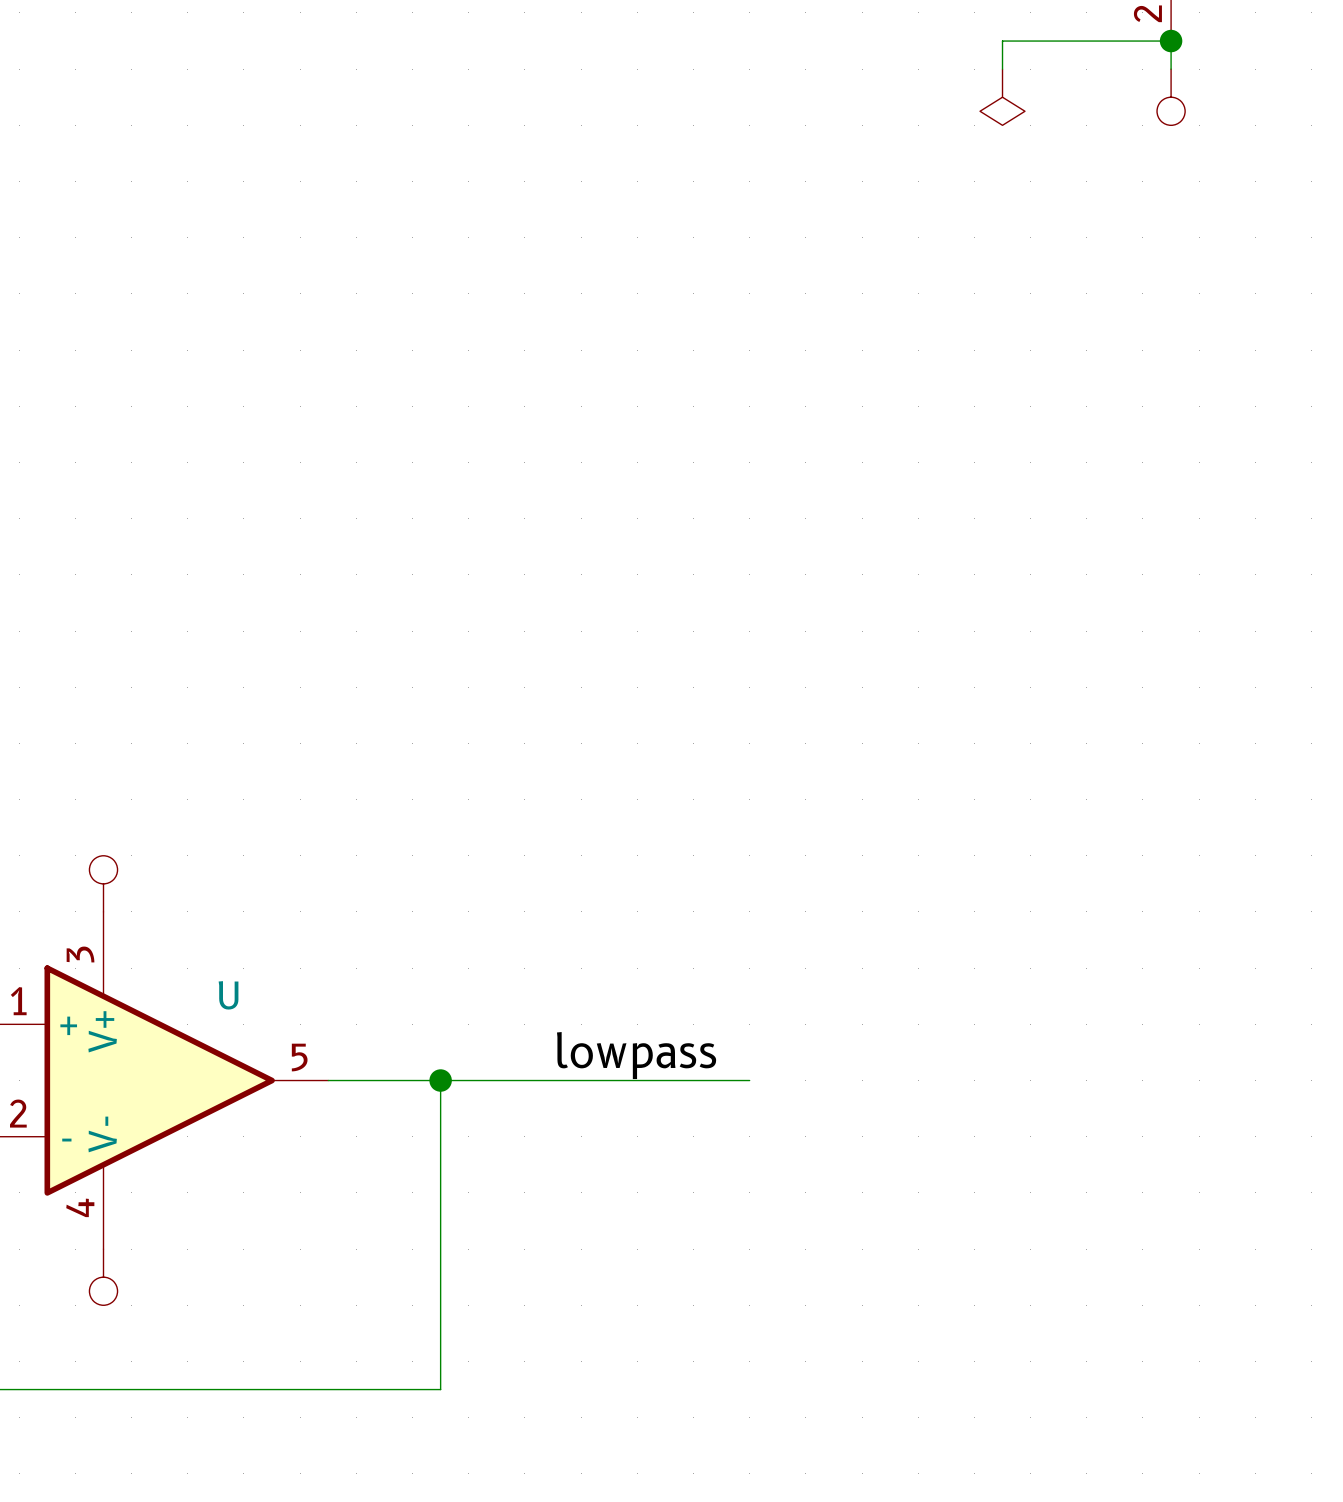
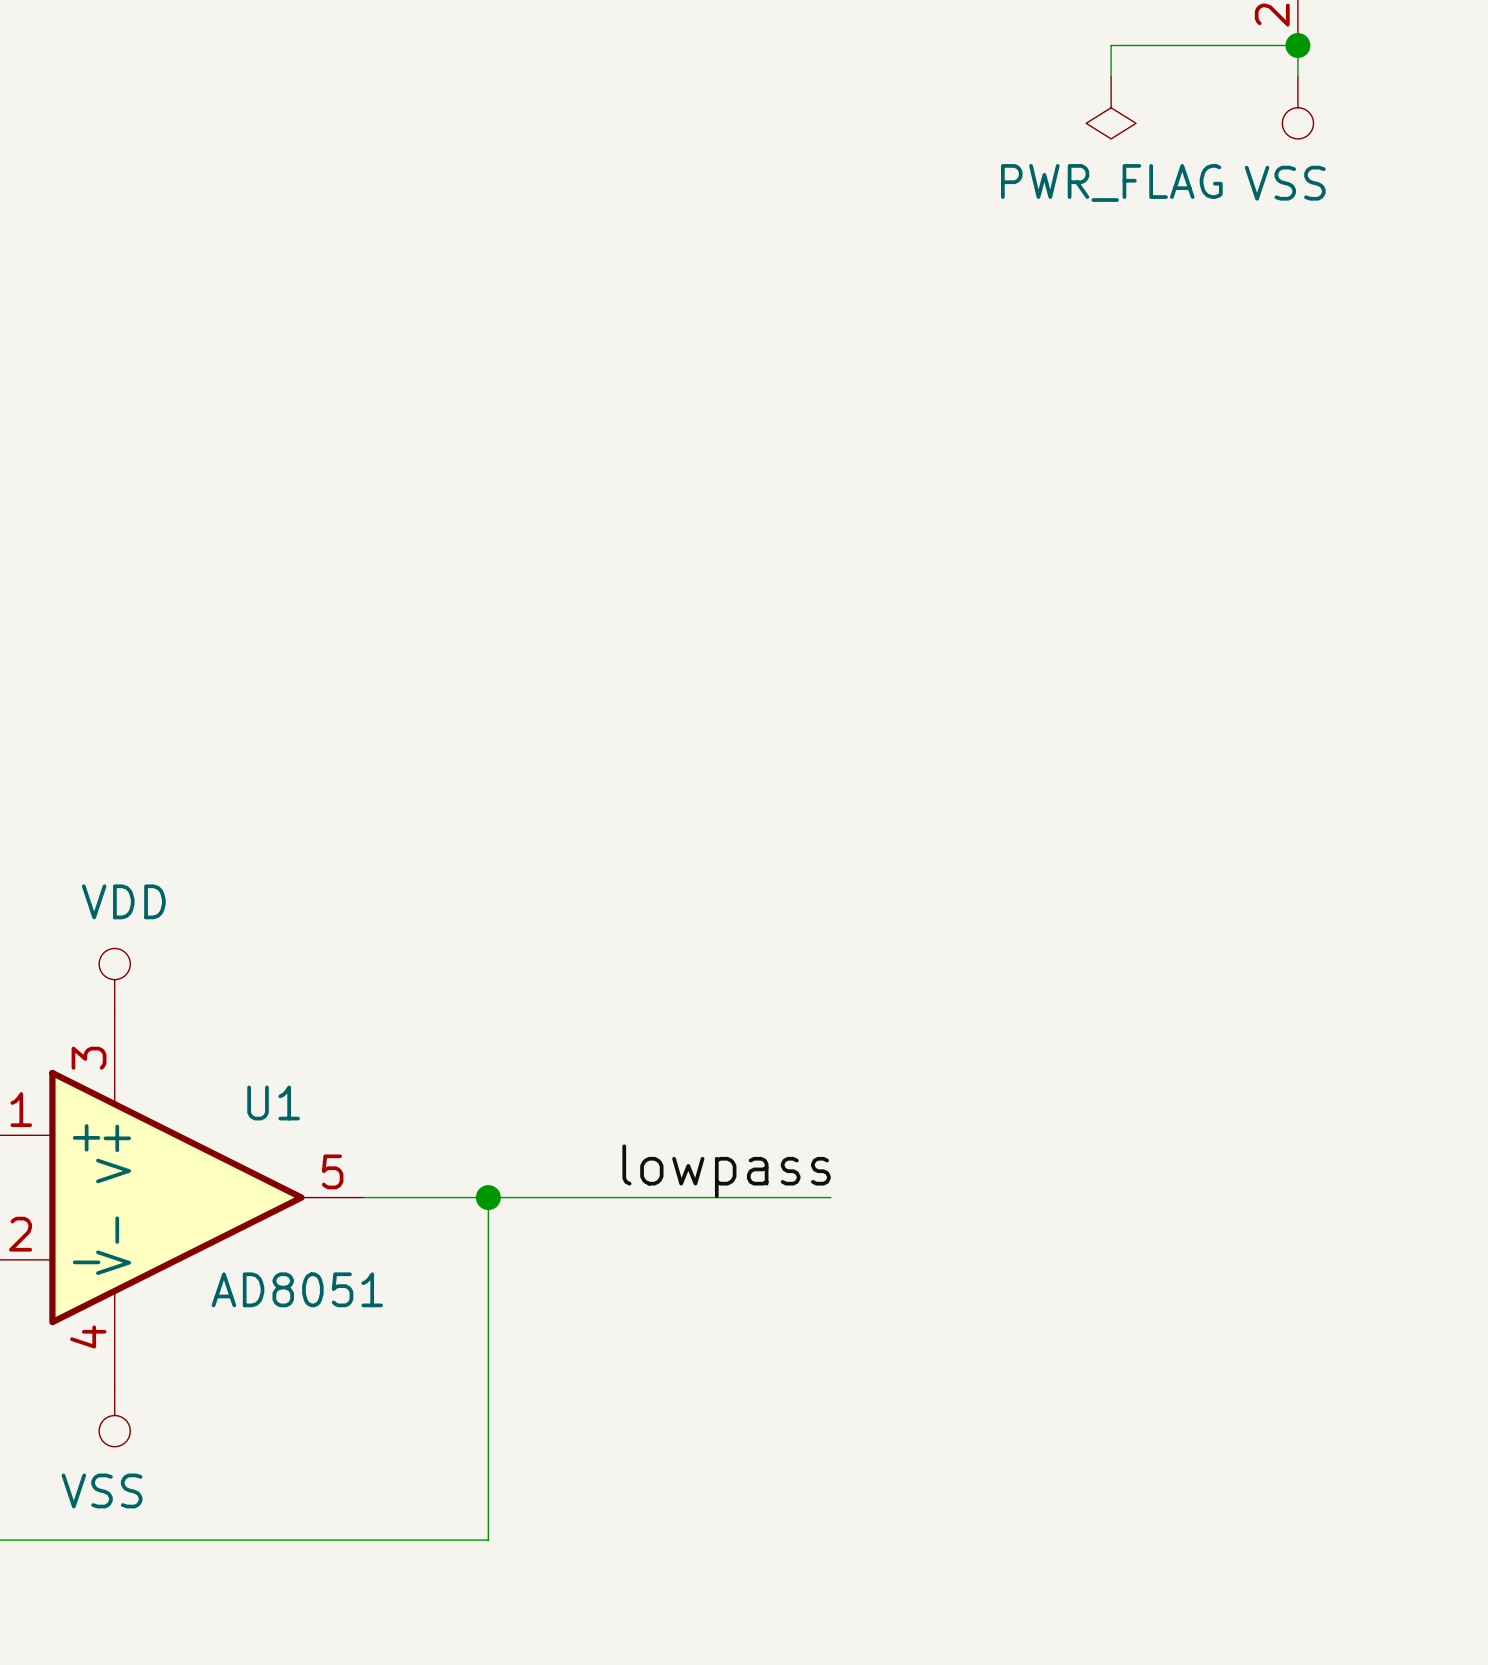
power symbol text: none -> VSS (1285, 183)
power symbol text: none -> PWR_FLAG (1111, 182)
power symbol text: none -> VDD (123, 901)
U name: U (228, 995) -> U1 (273, 1103)
U value: none -> AD8051 (297, 1289)
power symbol text: none -> VSS (102, 1490)

